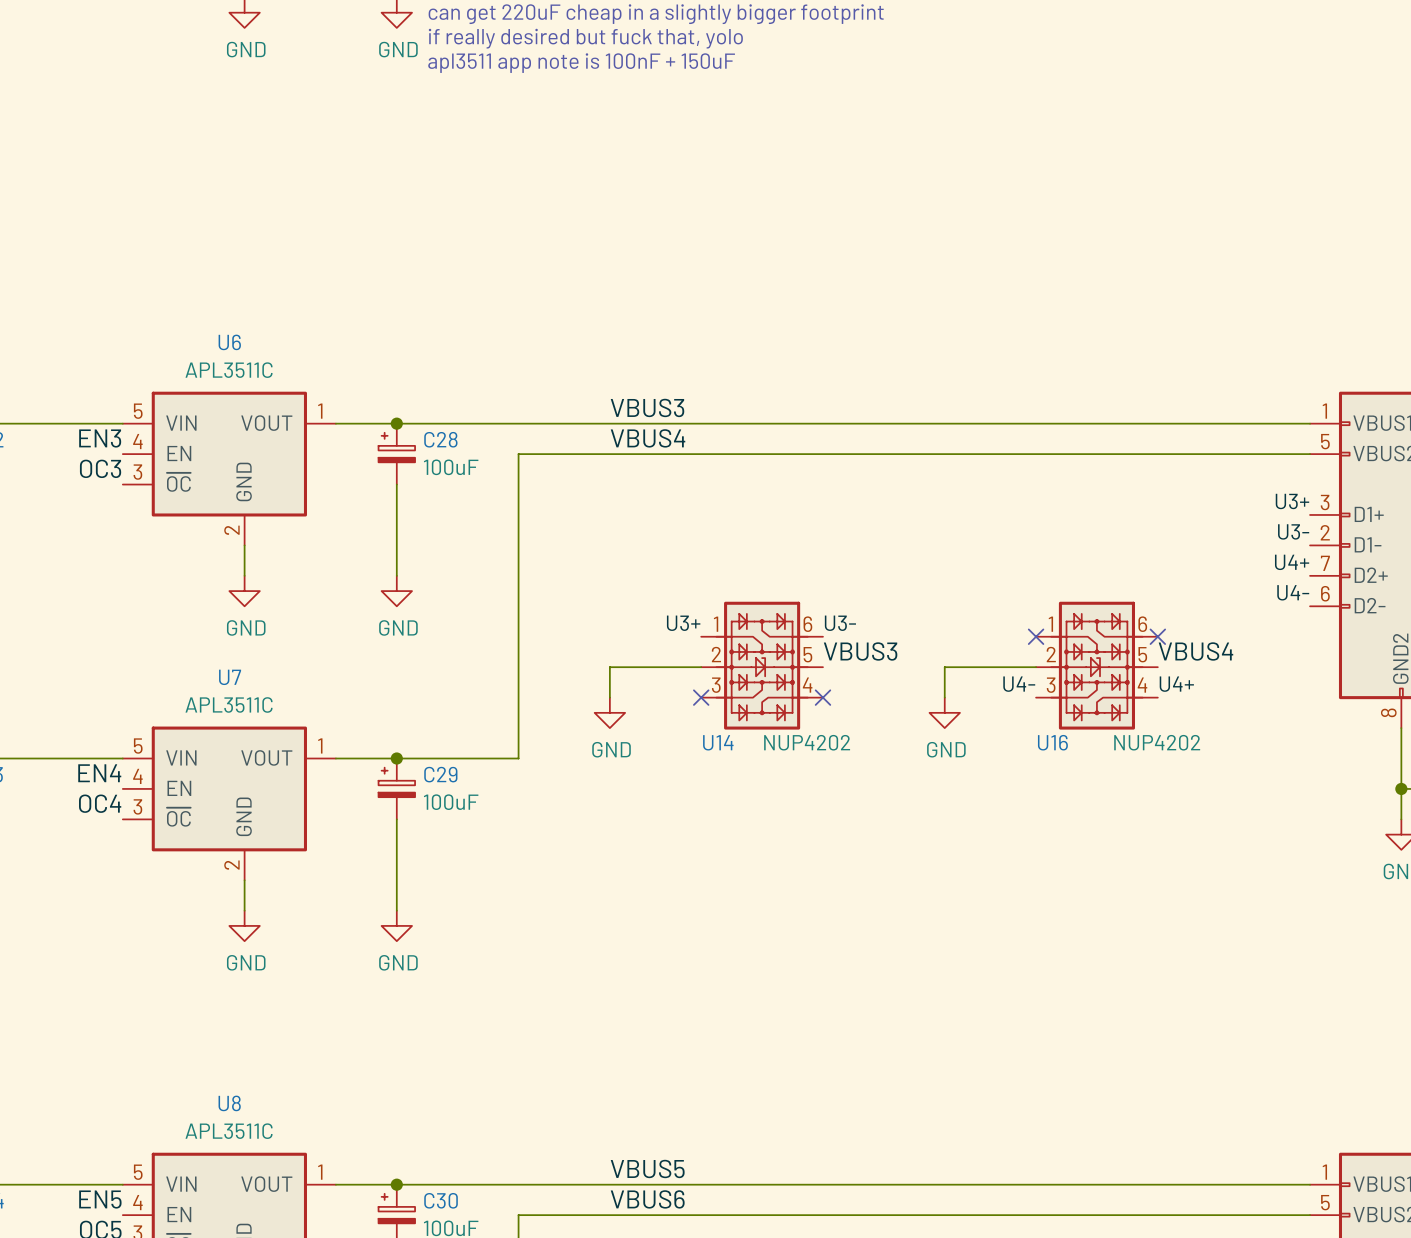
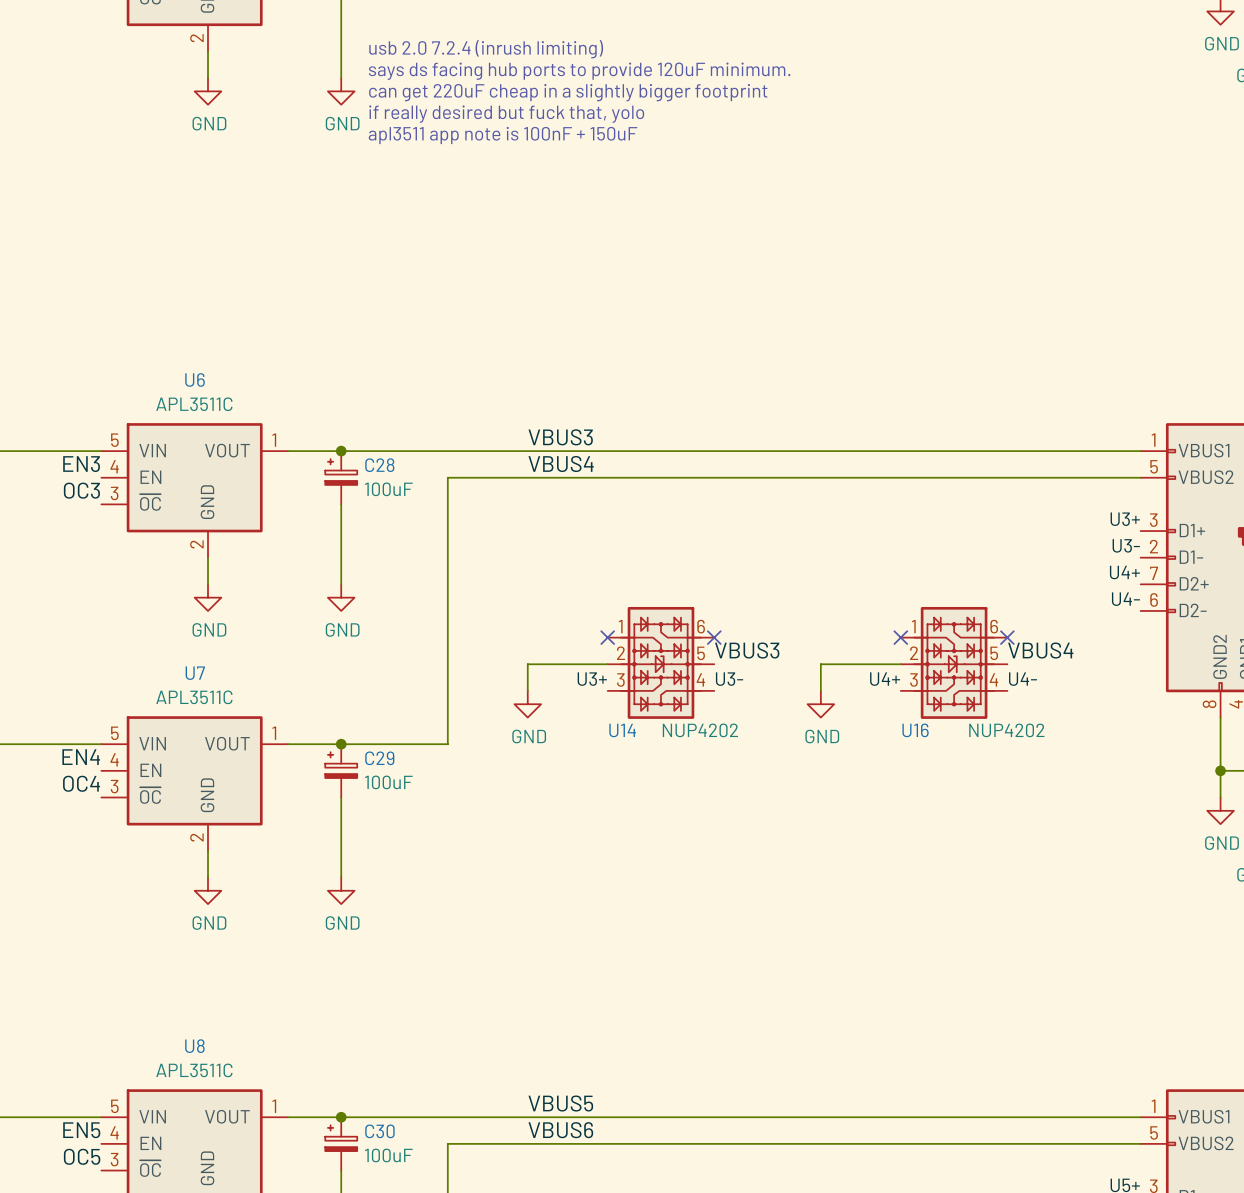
label position: U3+ (683, 623) -> U3+ (592, 679)
label position: U3- (840, 623) -> U3- (729, 679)
label: U4- (1019, 684) -> U4+ (885, 679)
label: U4+ (1176, 684) -> U4- (1022, 679)
no-connect mark position: (701, 697) -> (607, 637)
no-connect mark position: (822, 697) -> (714, 637)

